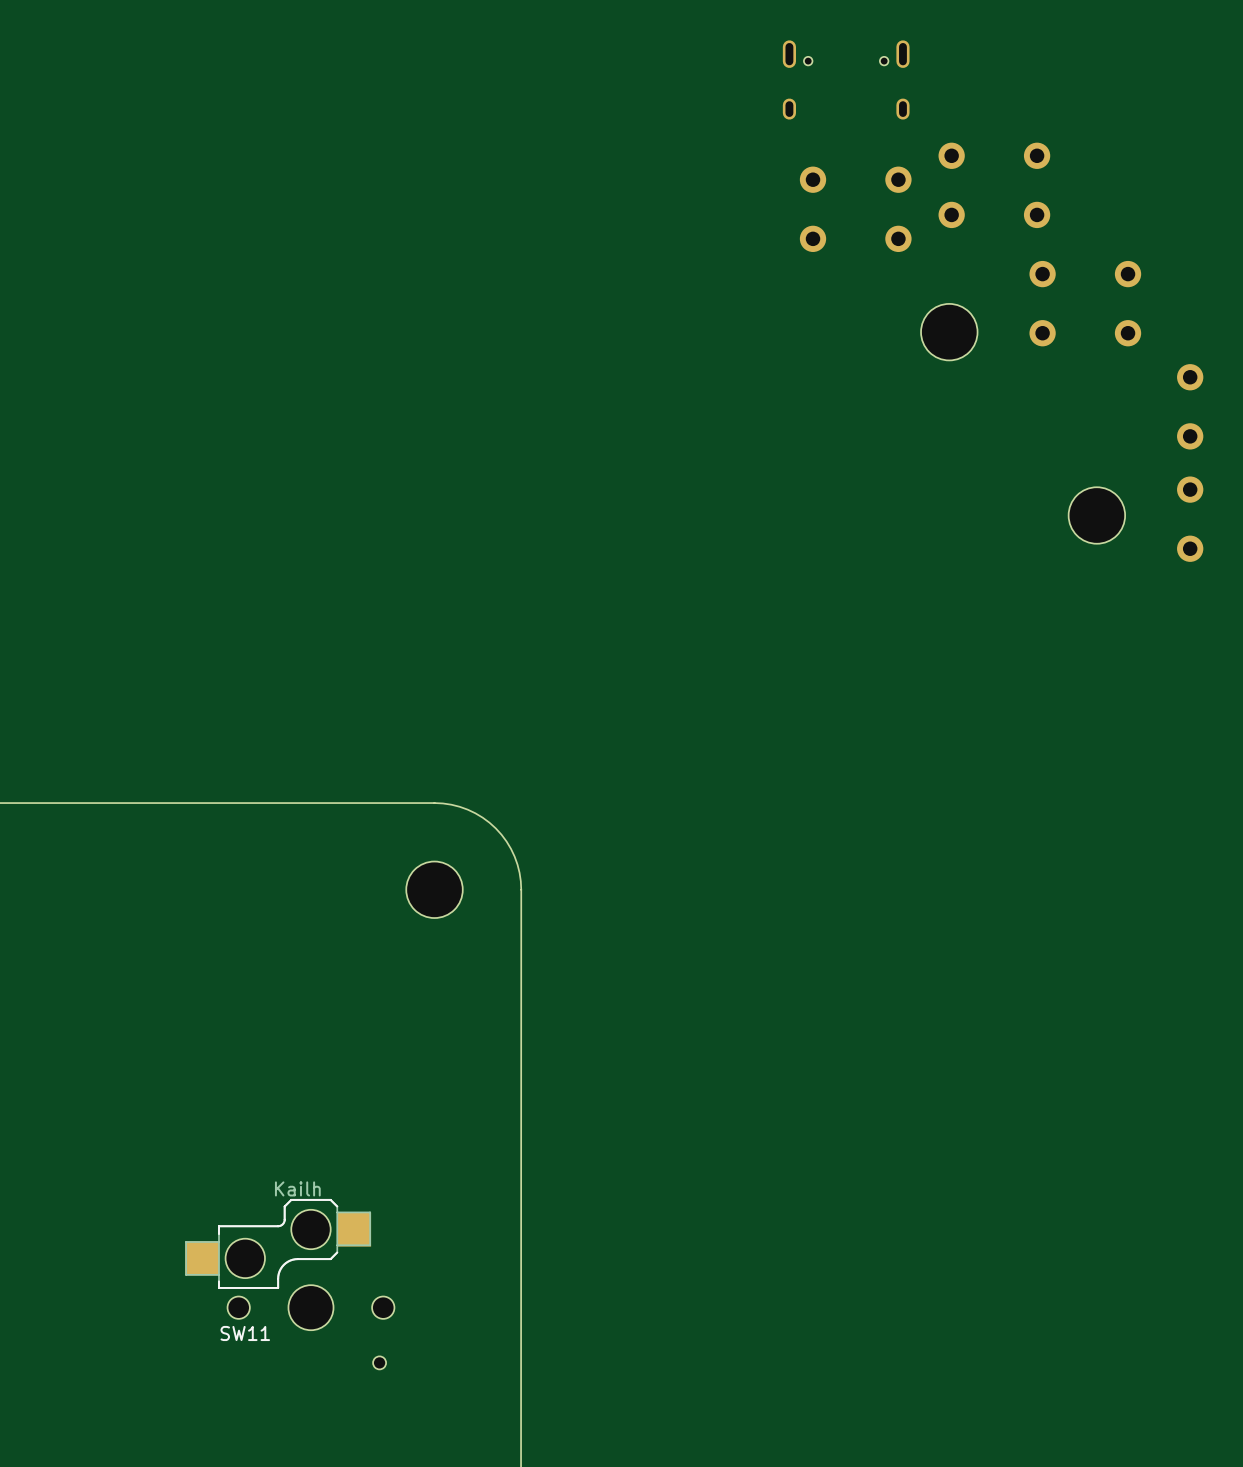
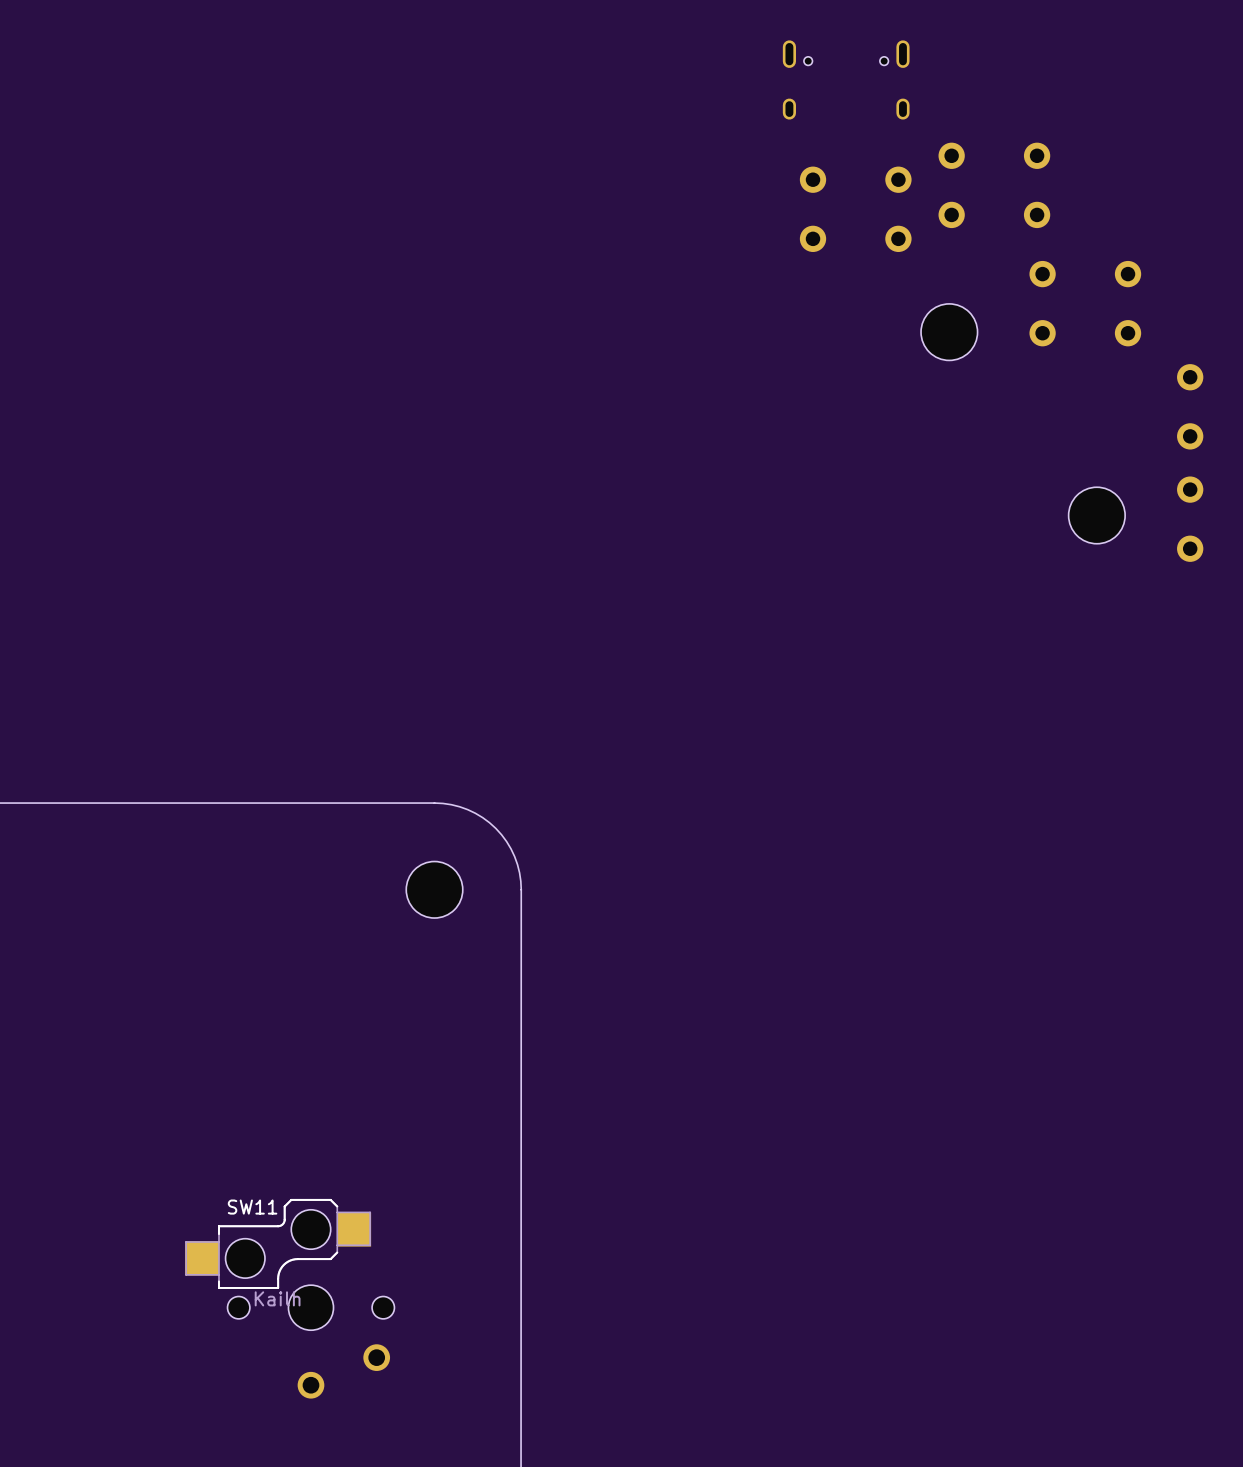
SW11 value position: Kailh (297, 1188) -> Kailh (277, 1298)
SW11 footprint: [185, 1198, 395, 1370] -> [185, 1198, 395, 1399]
SW11 name position: SW11 (245, 1333) -> SW11 (252, 1207)

